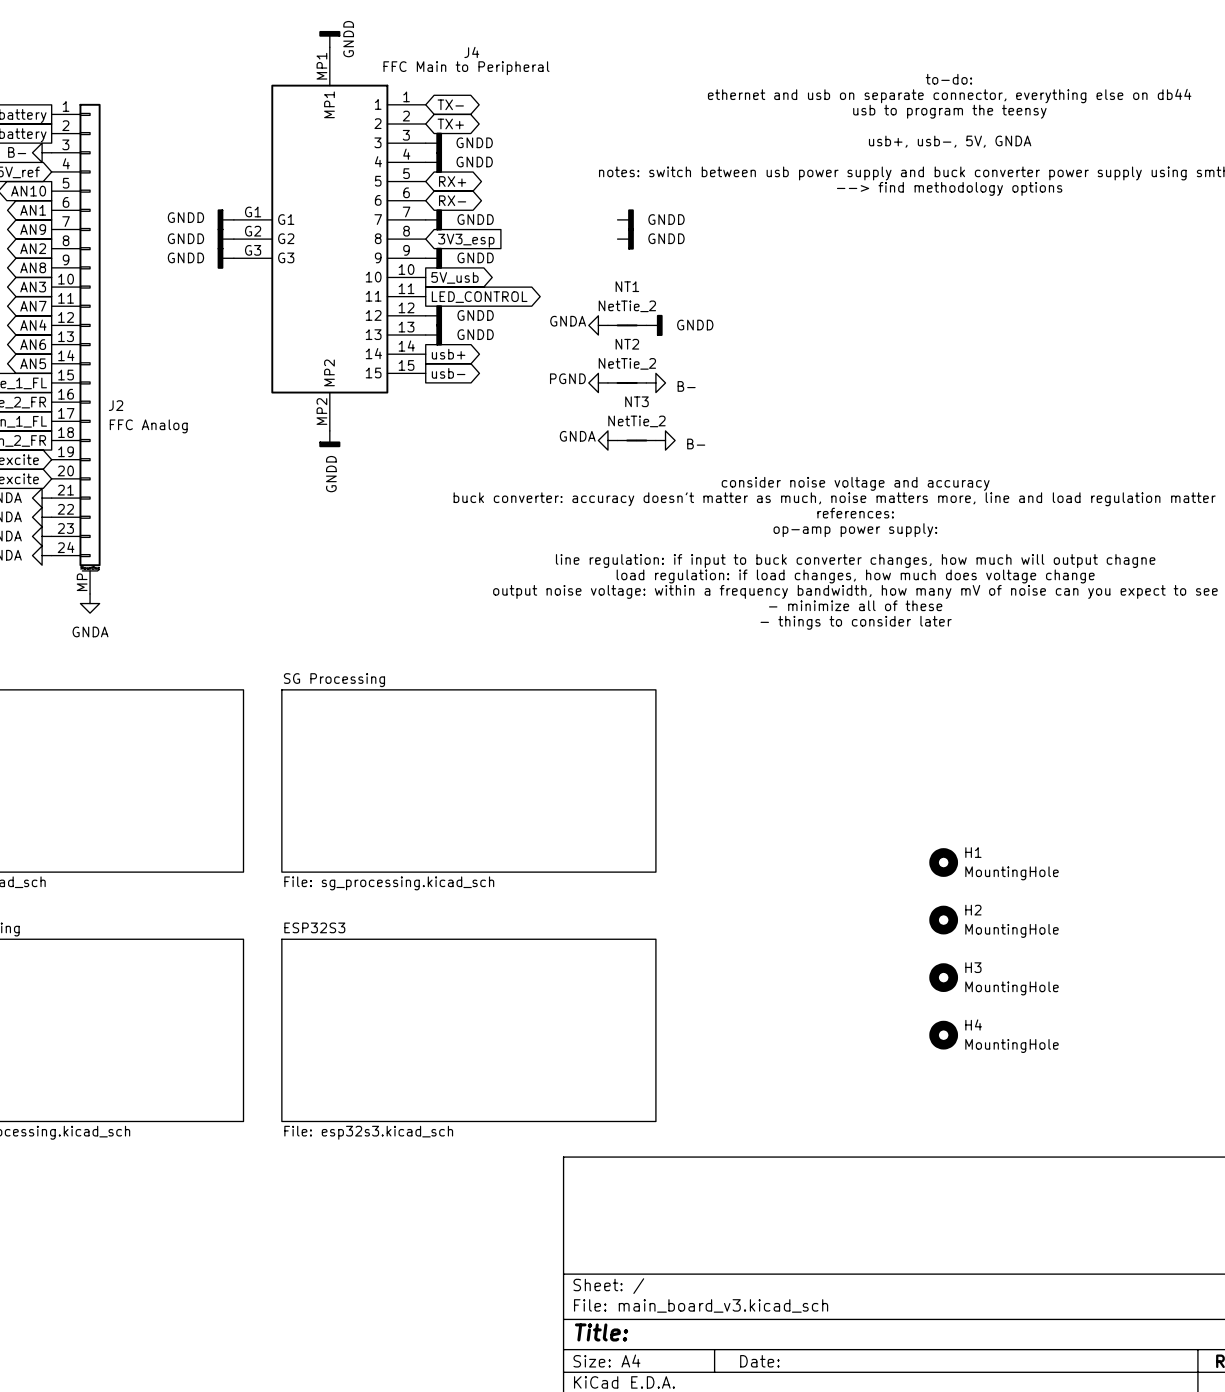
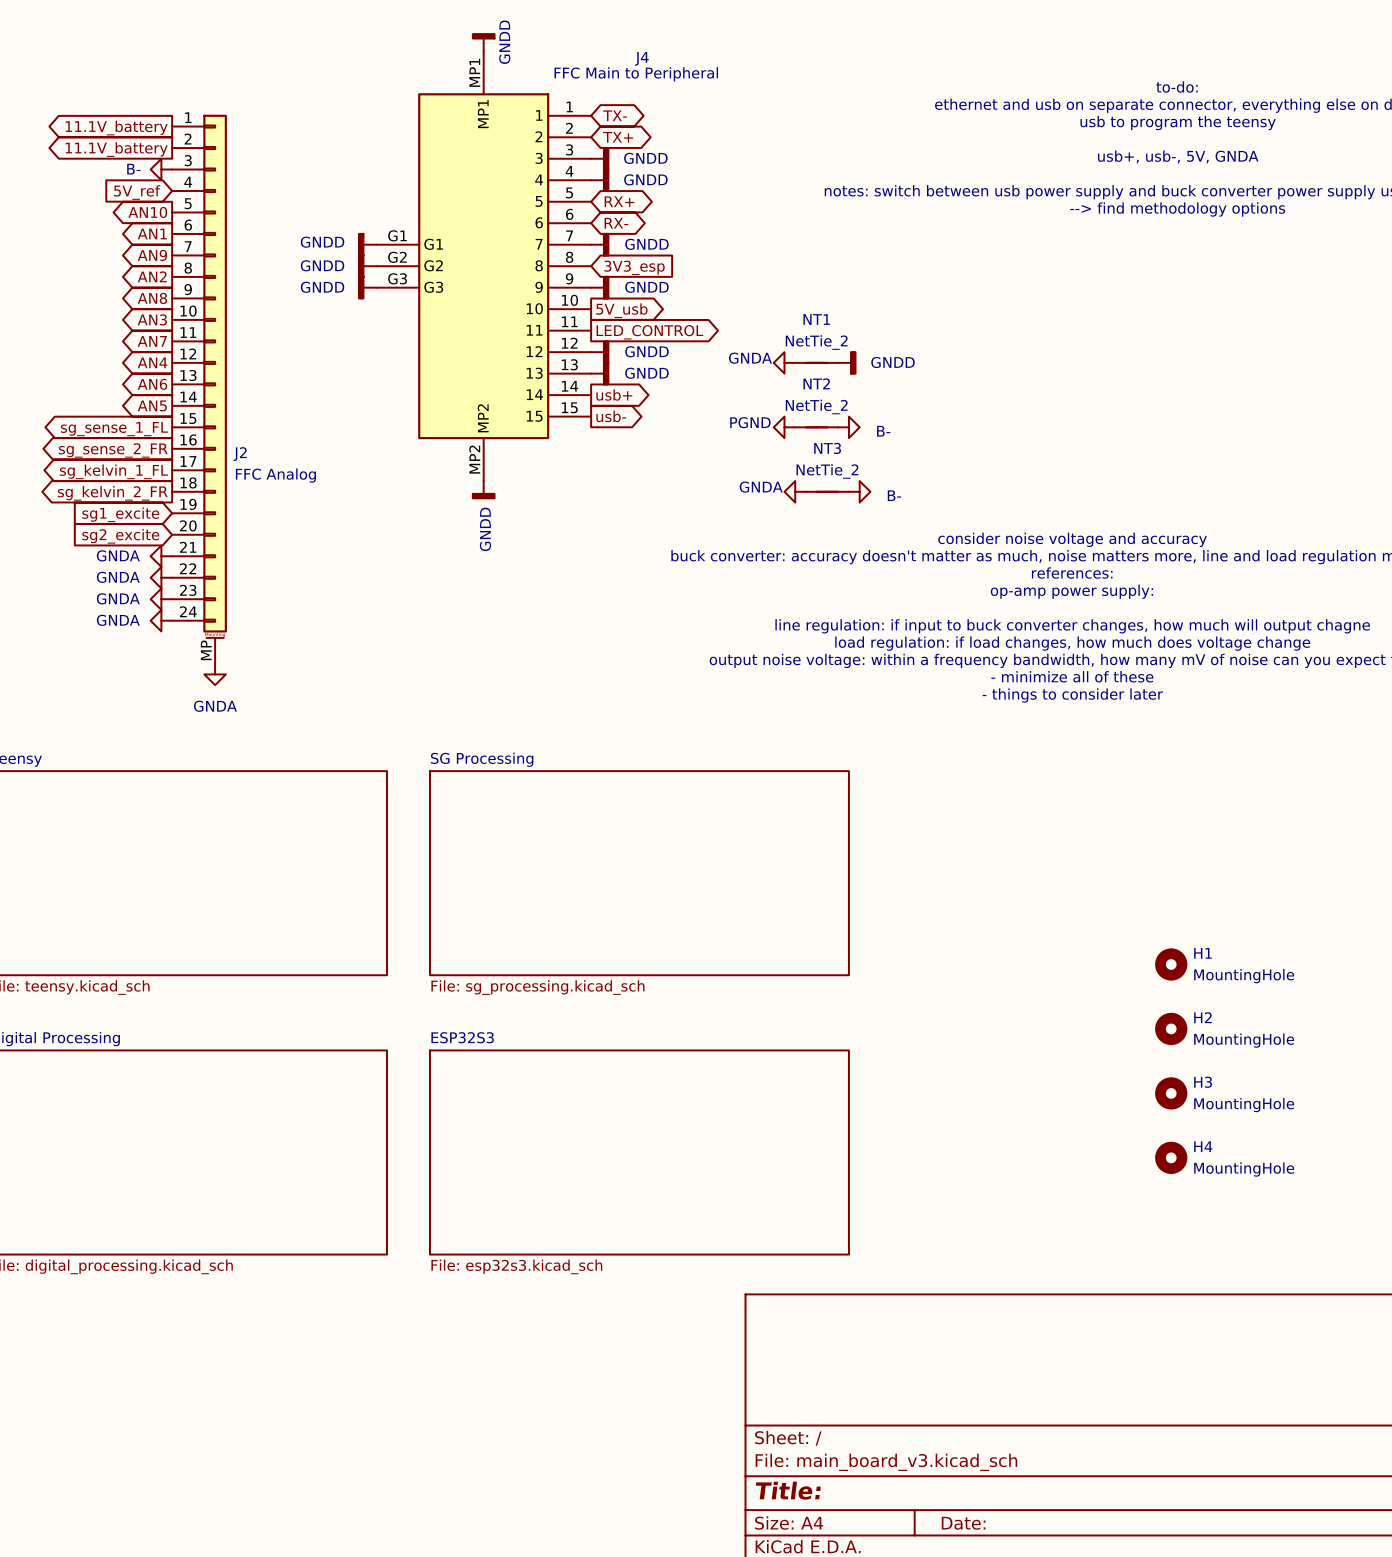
power symbol: GNDD (625, 219) -> none
power symbol: GNDD (625, 239) -> none

